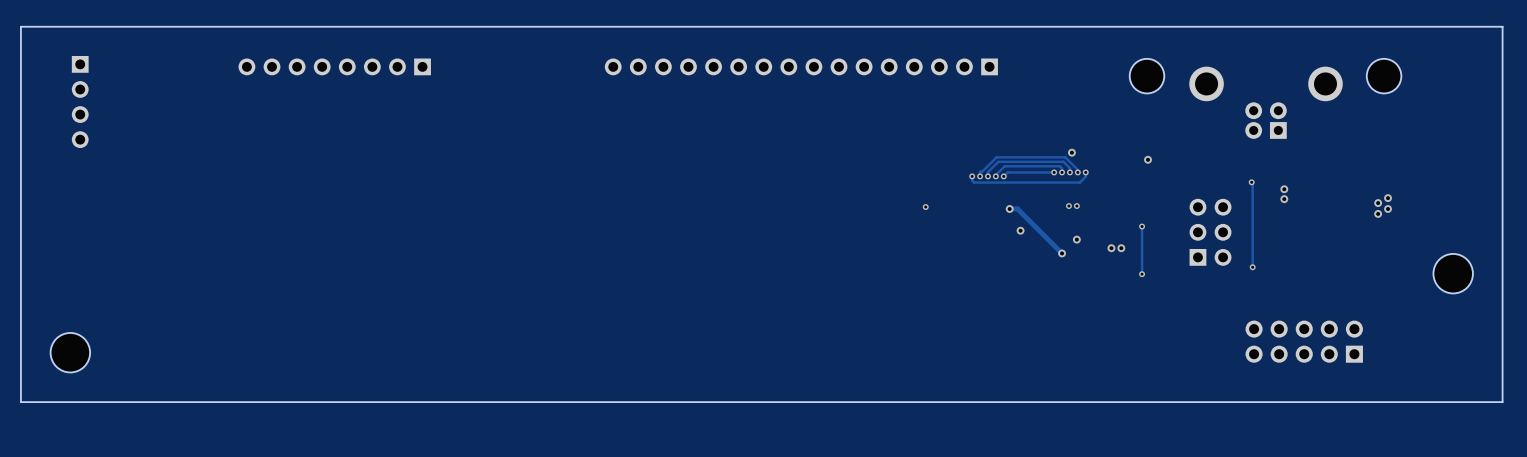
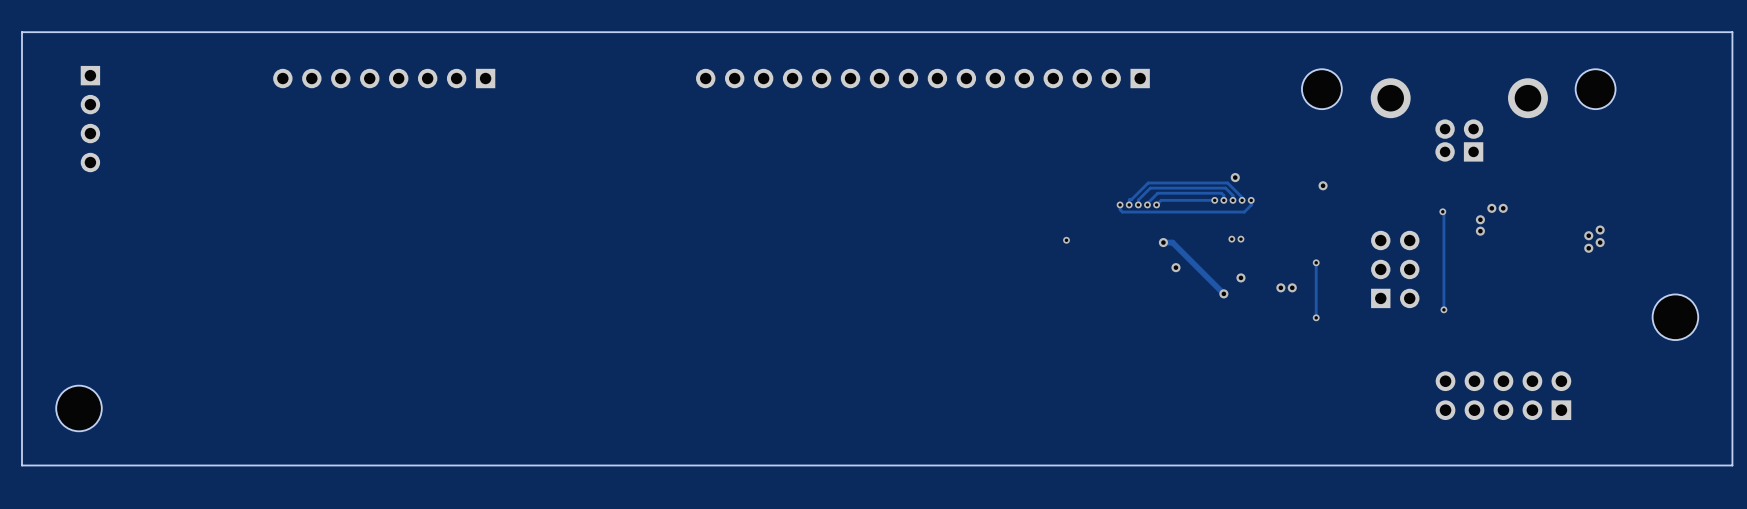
via: none -> (1491, 208)
via: none -> (1503, 208)

